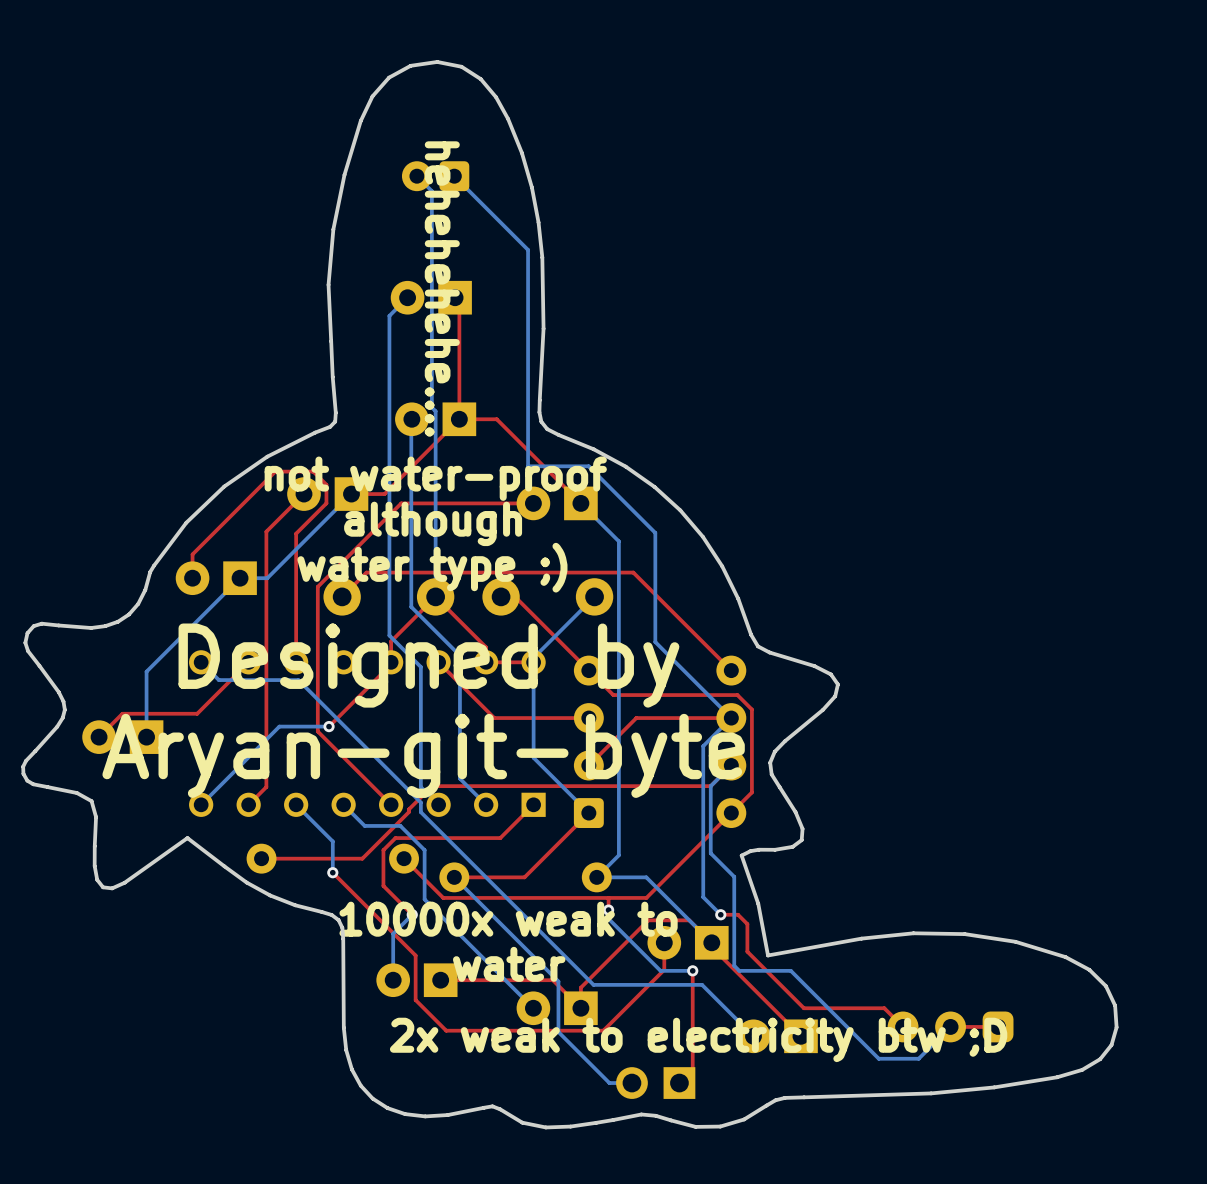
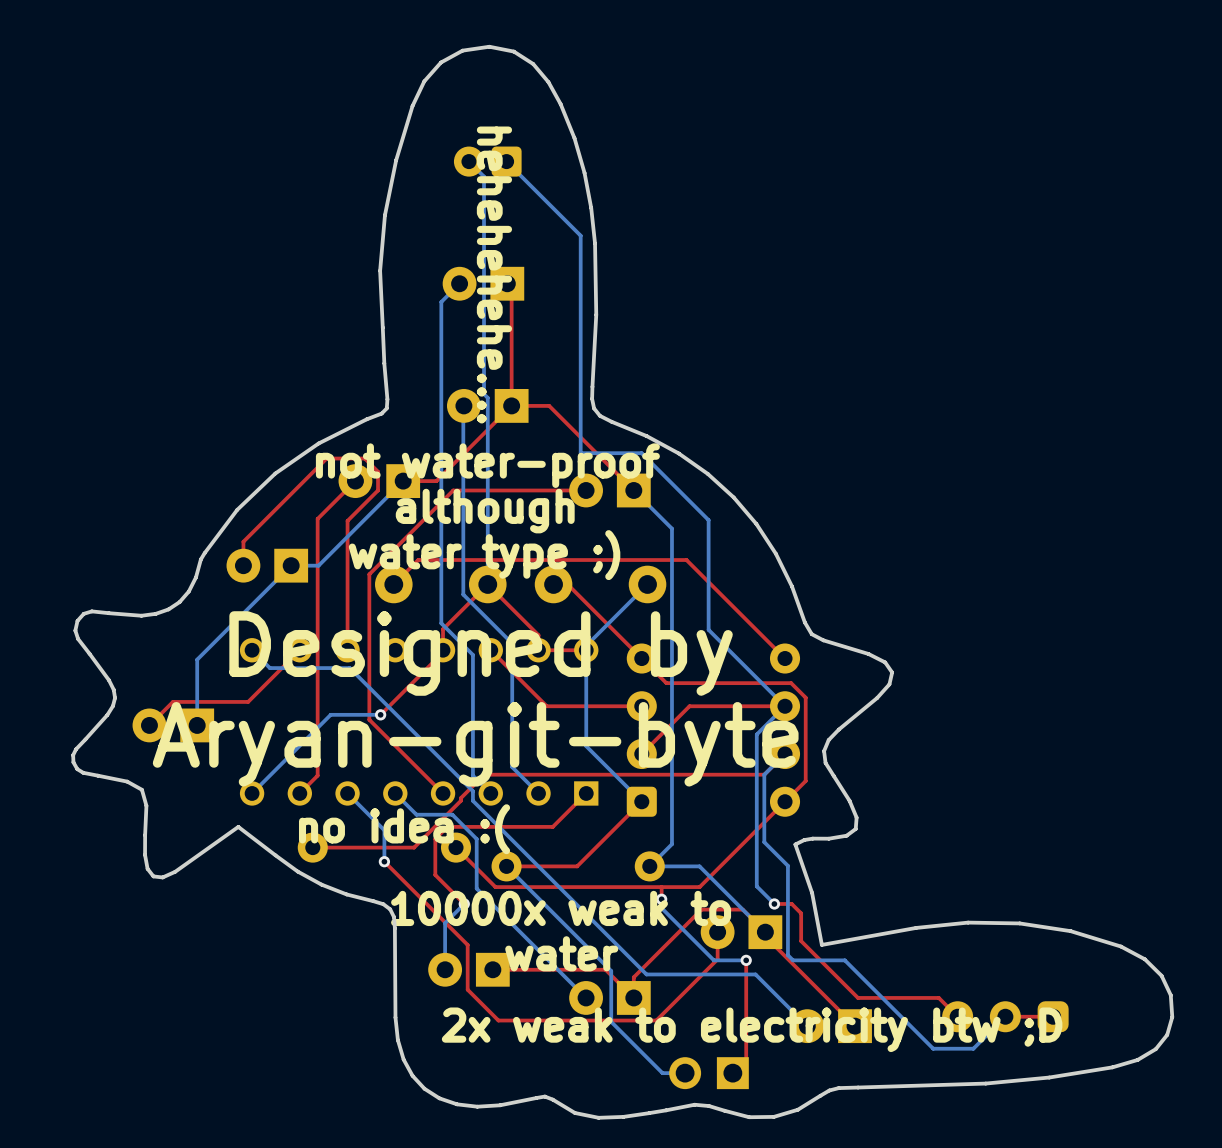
text: none -> no idea :( (404, 829)

